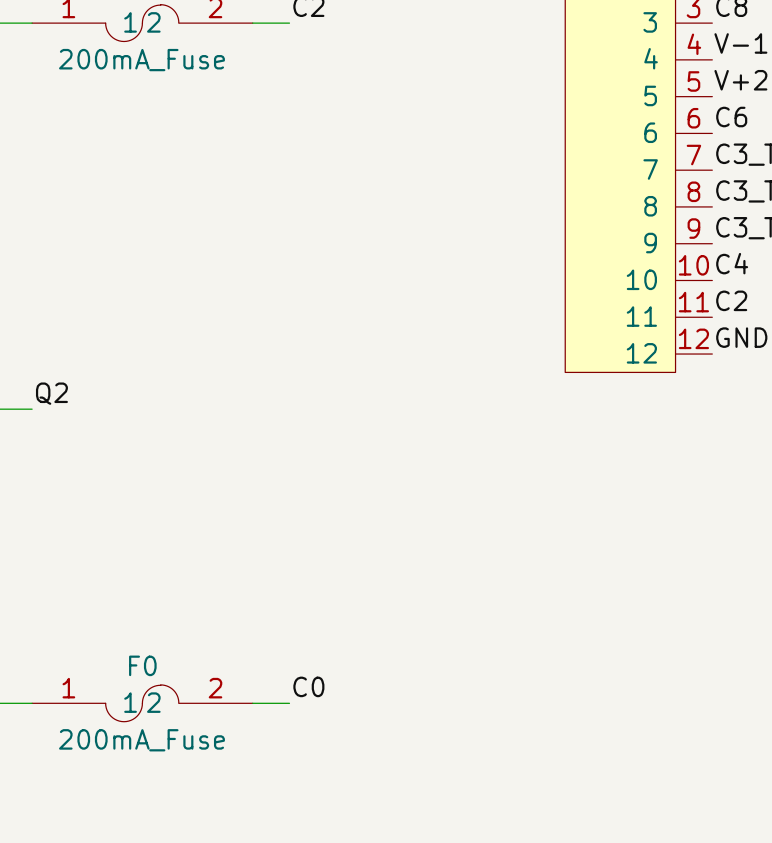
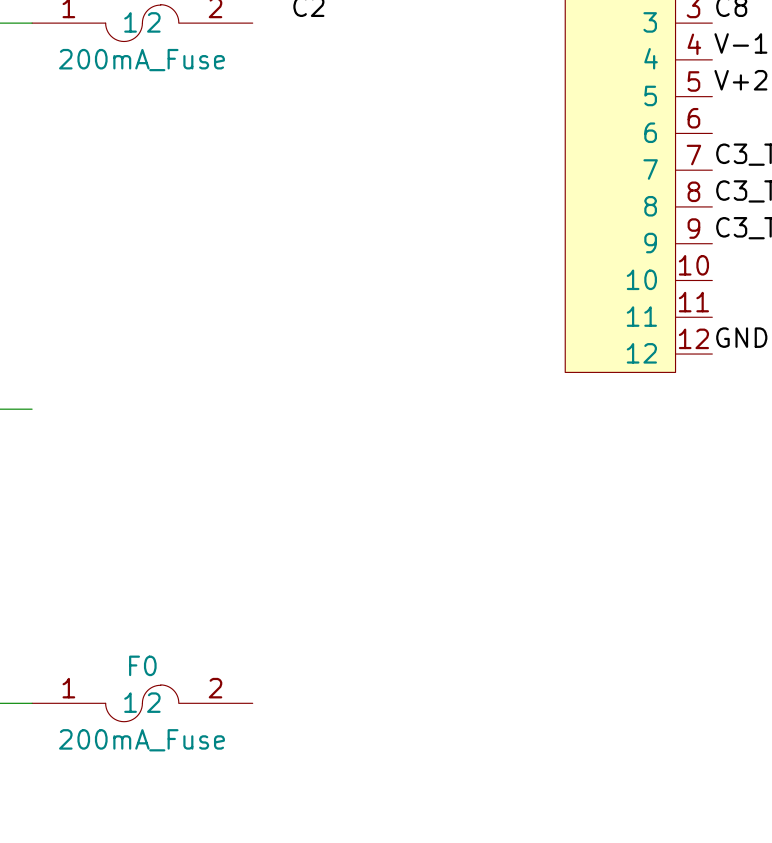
wire: (252, 23) (289, 23) -> none
label: C6 (731, 117) -> none
label: C4 (732, 263) -> none
label: C2 (731, 300) -> none
label: Q2 (51, 393) -> none
label: C0 (308, 686) -> none
wire: (252, 703) (289, 703) -> none

